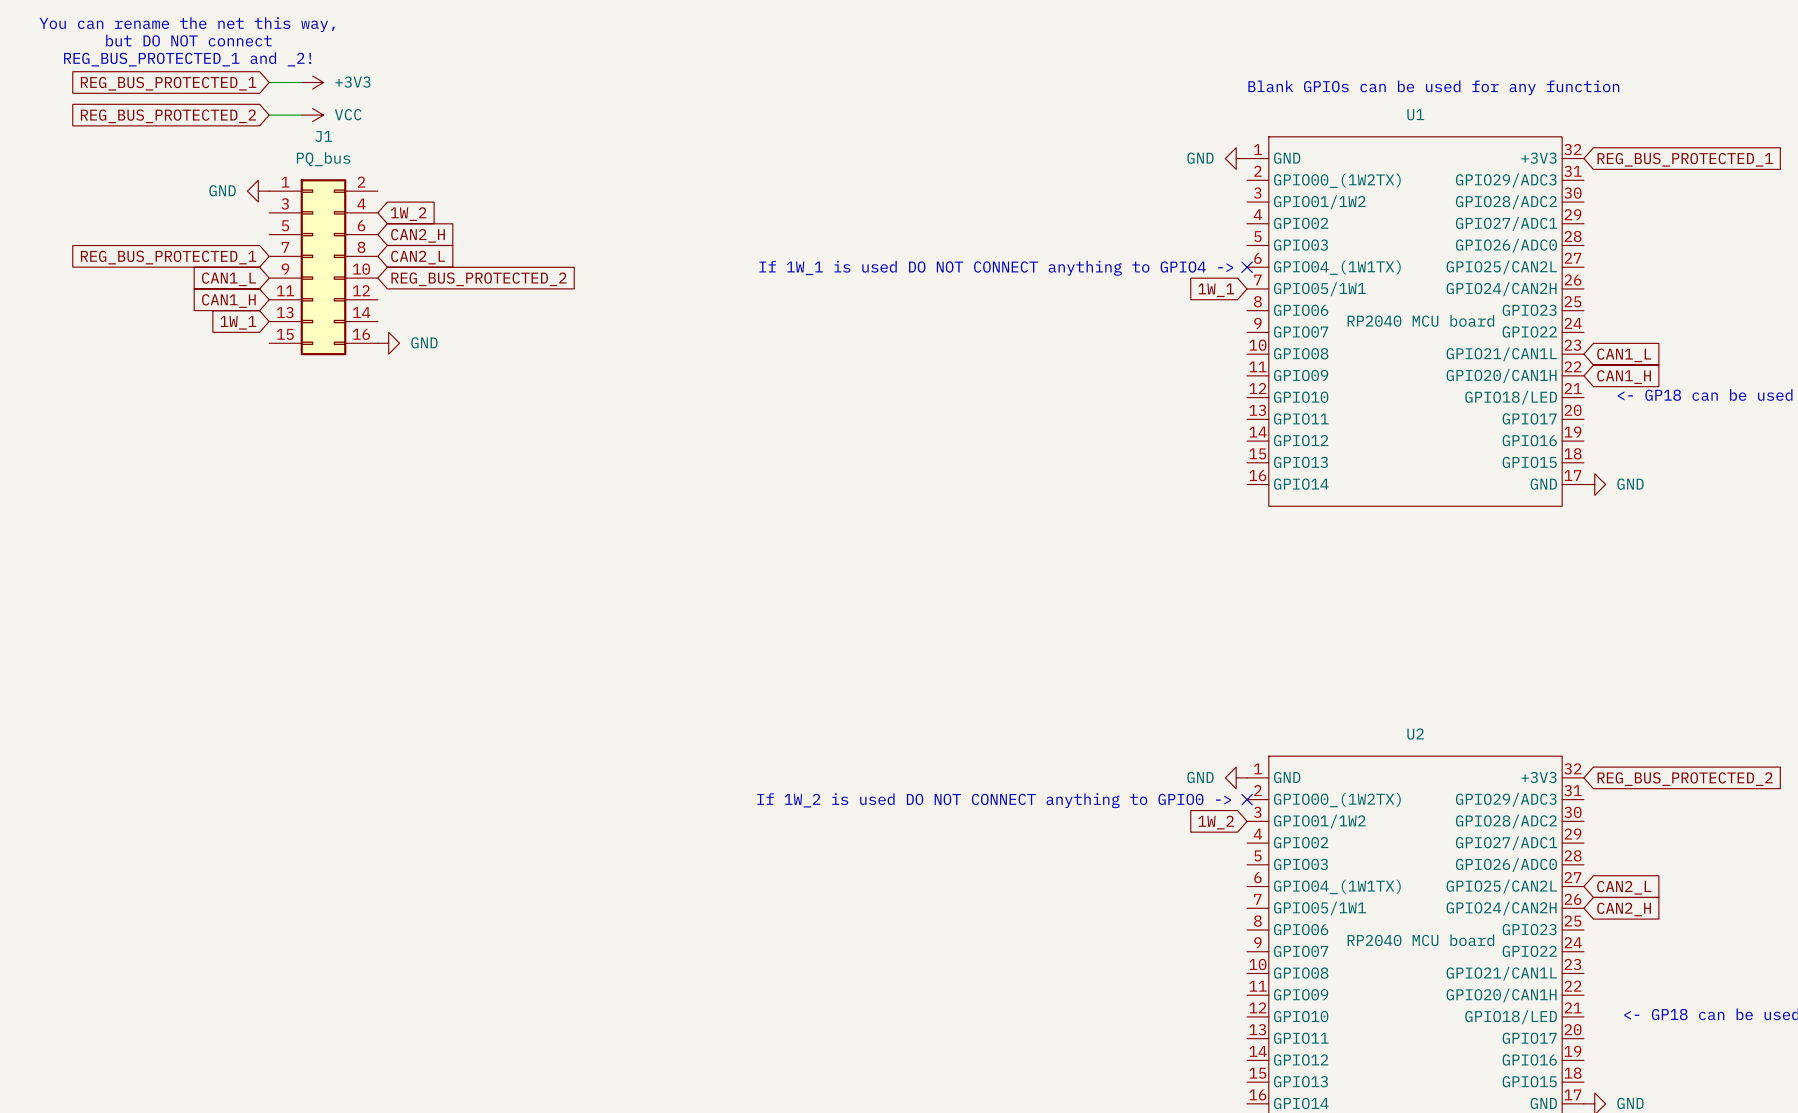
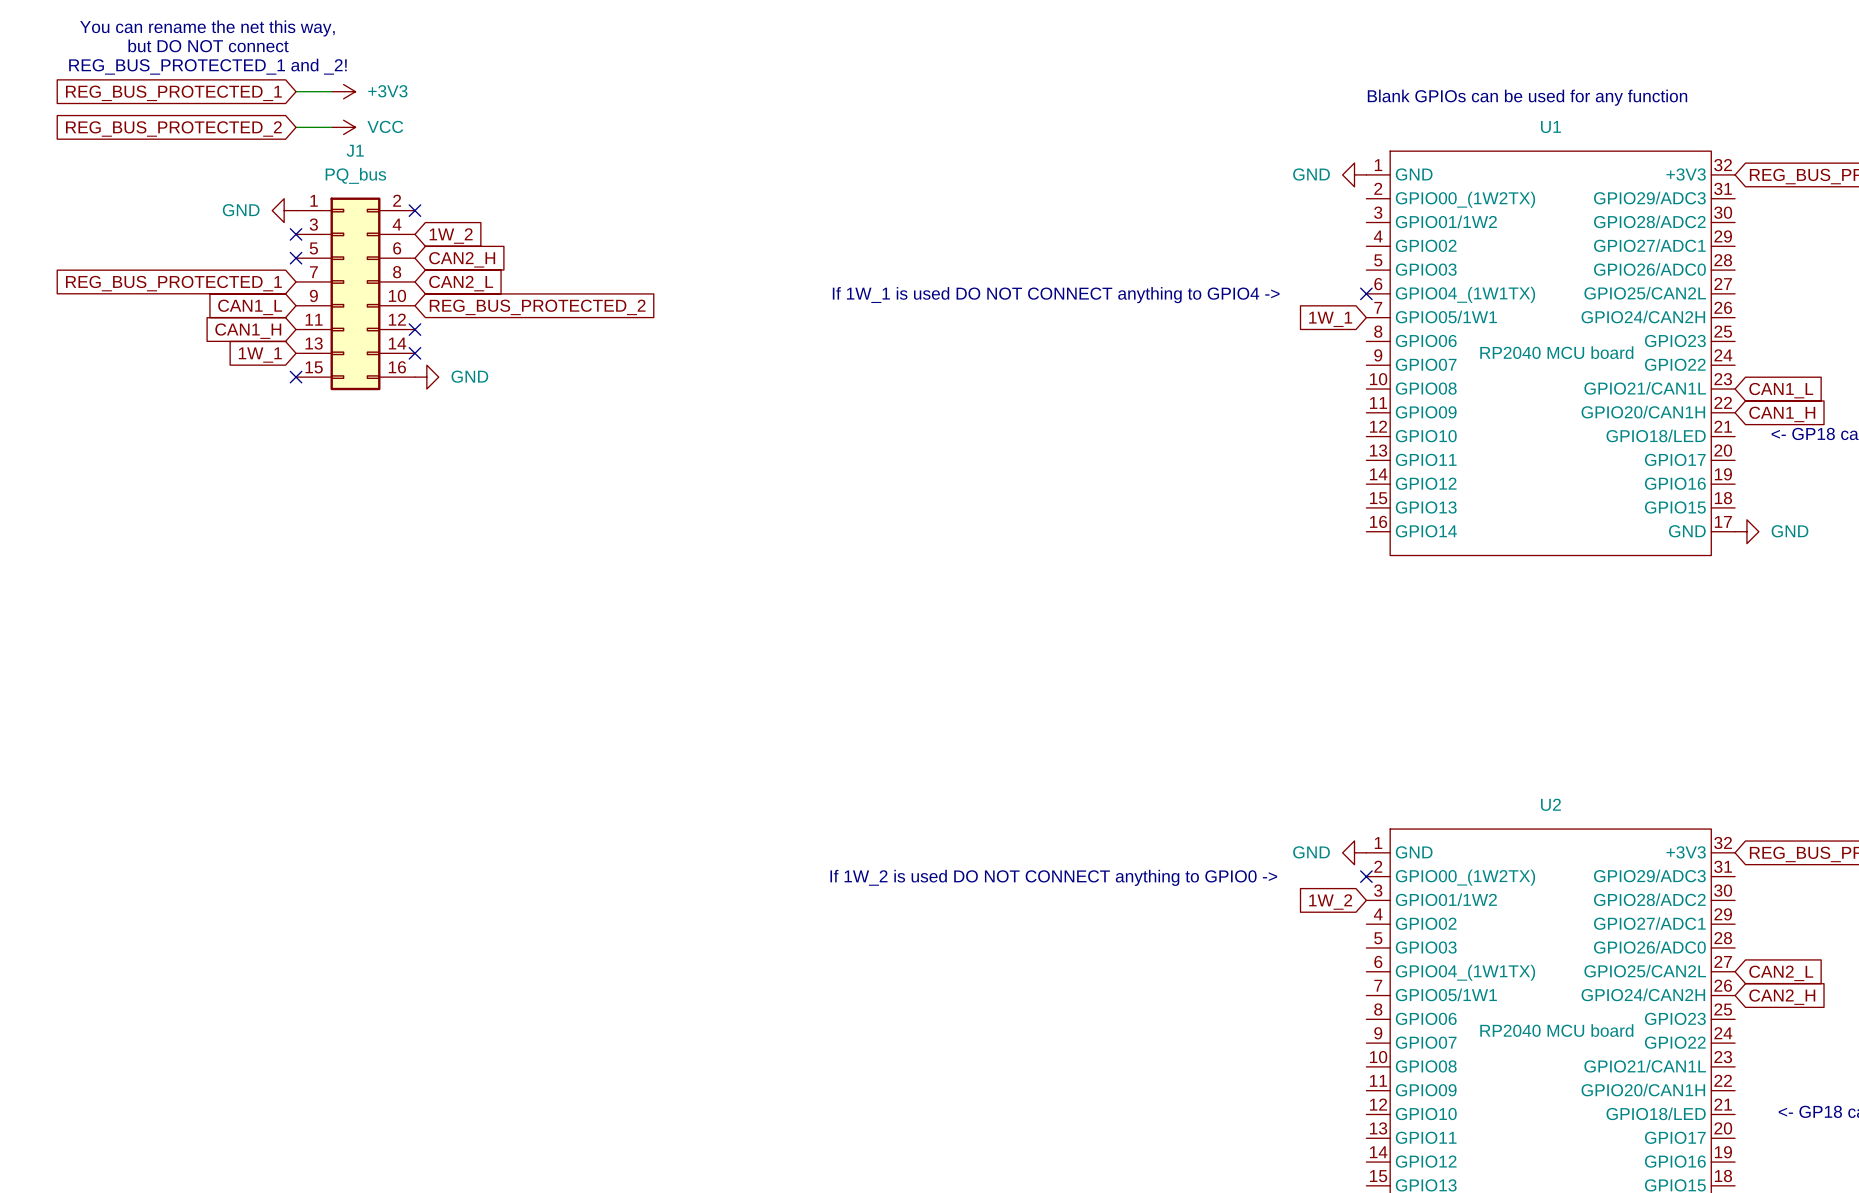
no-connect mark: none -> (414, 210)
no-connect mark: none -> (296, 234)
no-connect mark: none -> (296, 258)
no-connect mark: none -> (414, 329)
no-connect mark: none -> (414, 353)
no-connect mark: none -> (296, 377)

